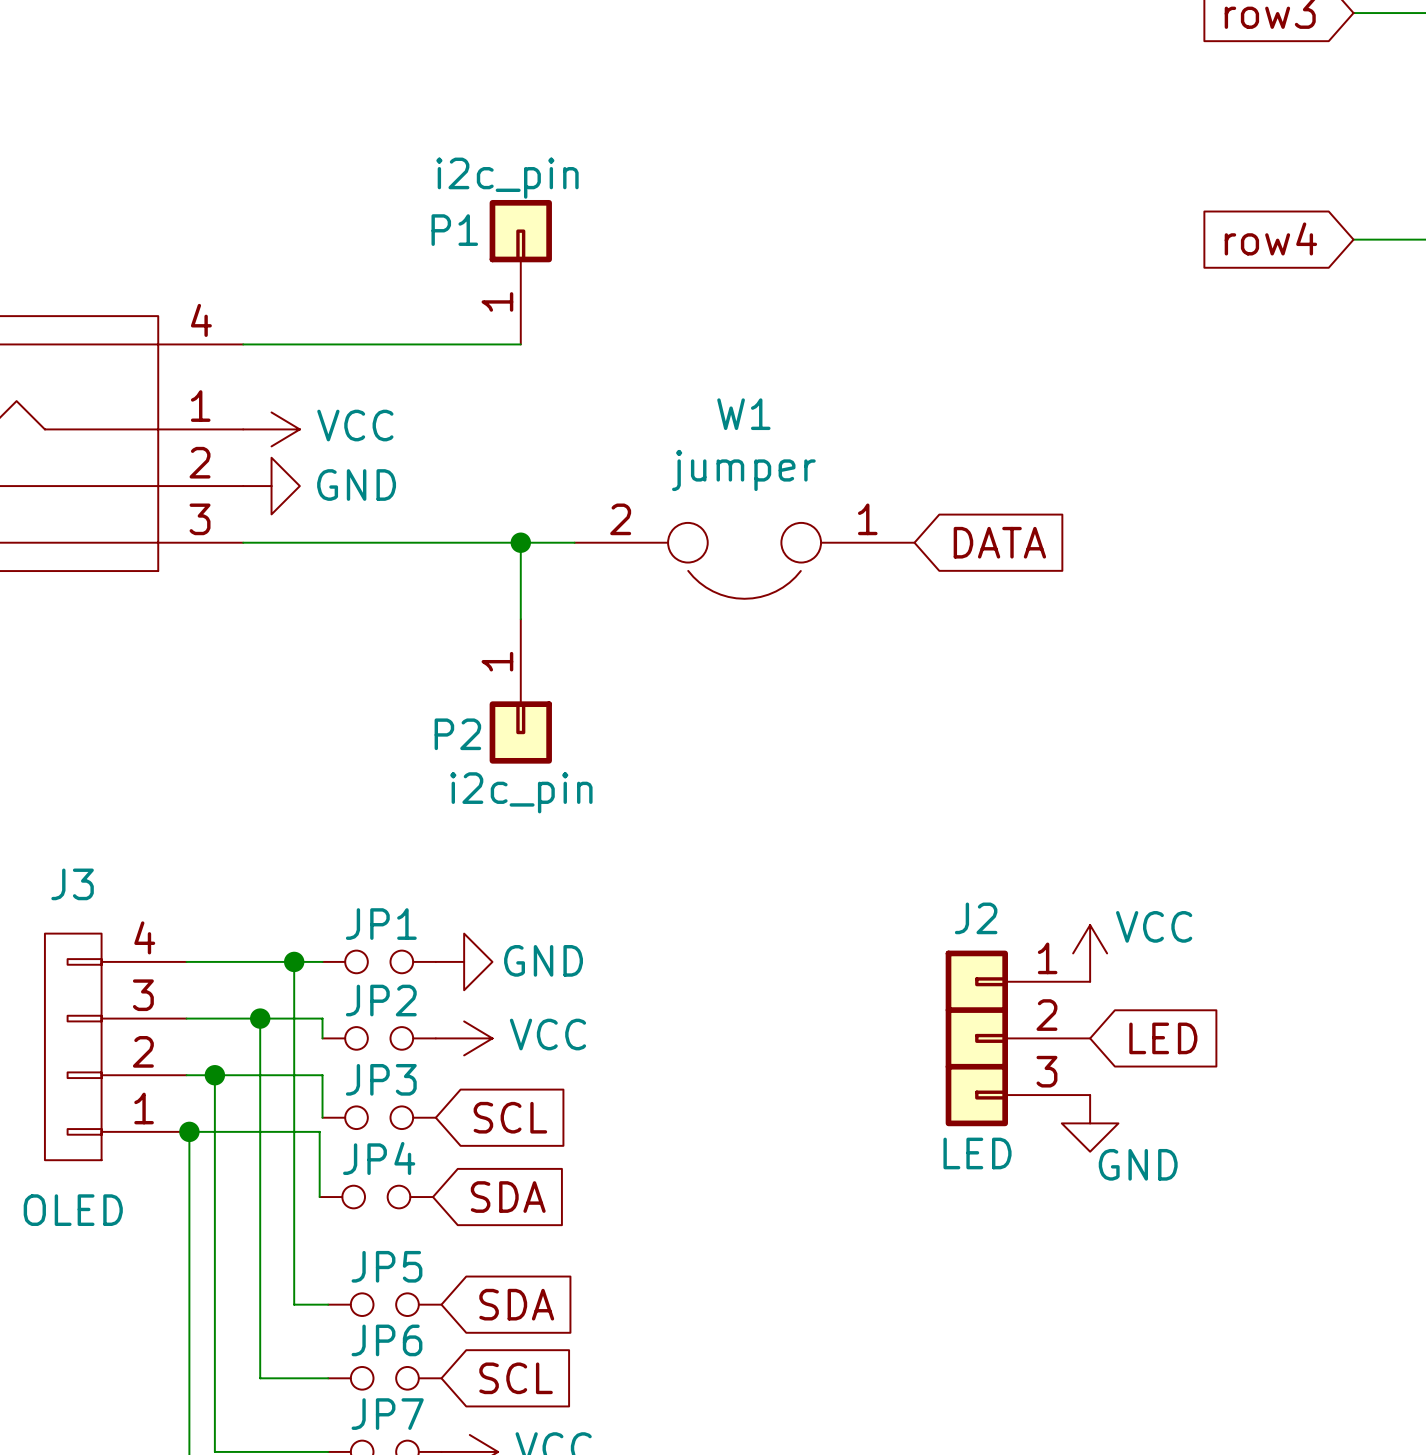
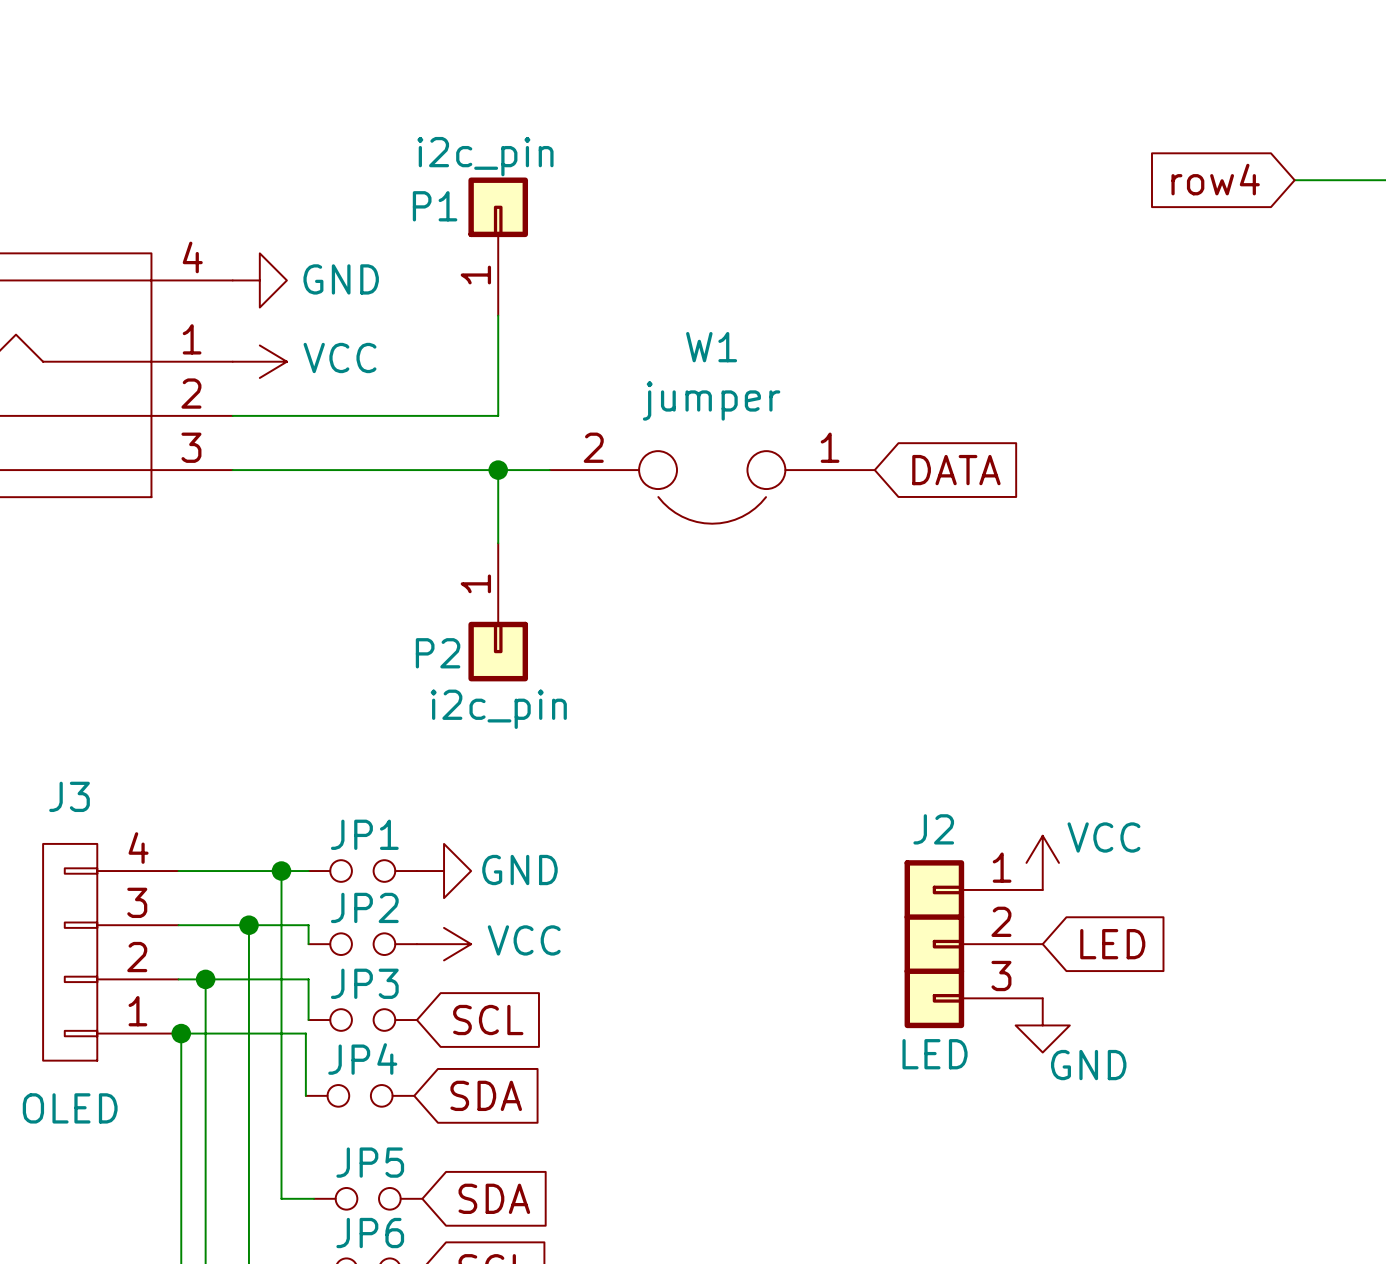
P1 position: (520, 272) -> (498, 246)
wire: (243, 344) (520, 344) -> none
wire: none -> (498, 315) (498, 415) (232, 415)
power symbol position: GND (271, 486) -> GND (259, 280)

